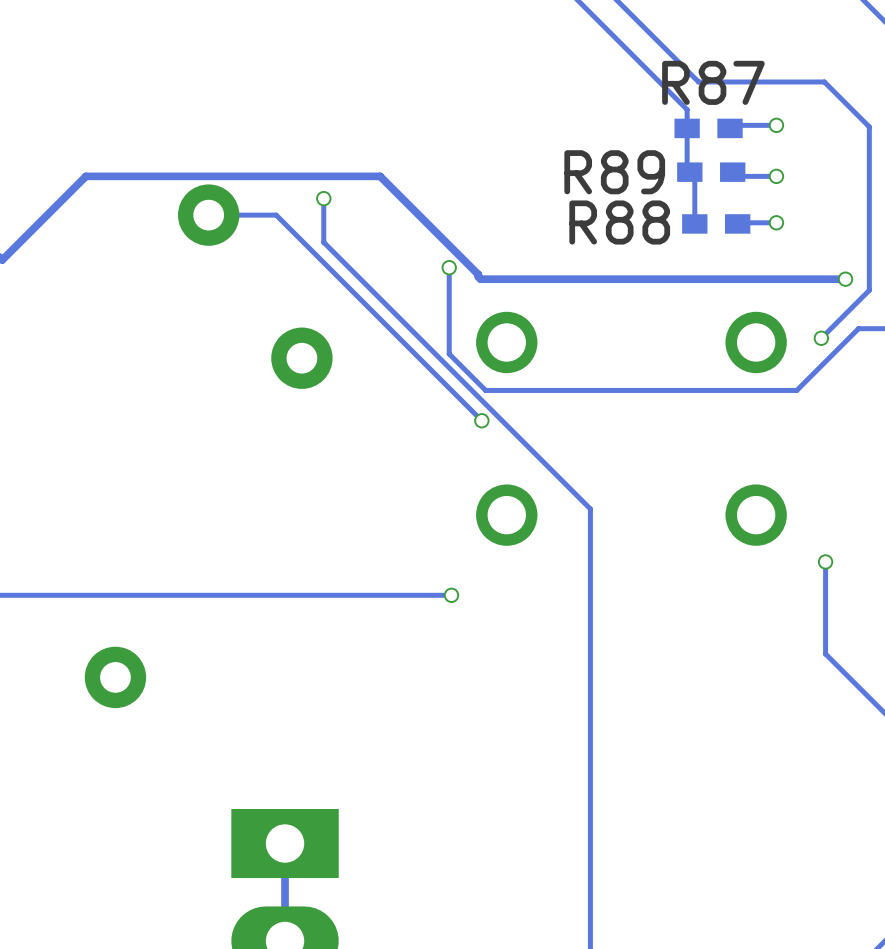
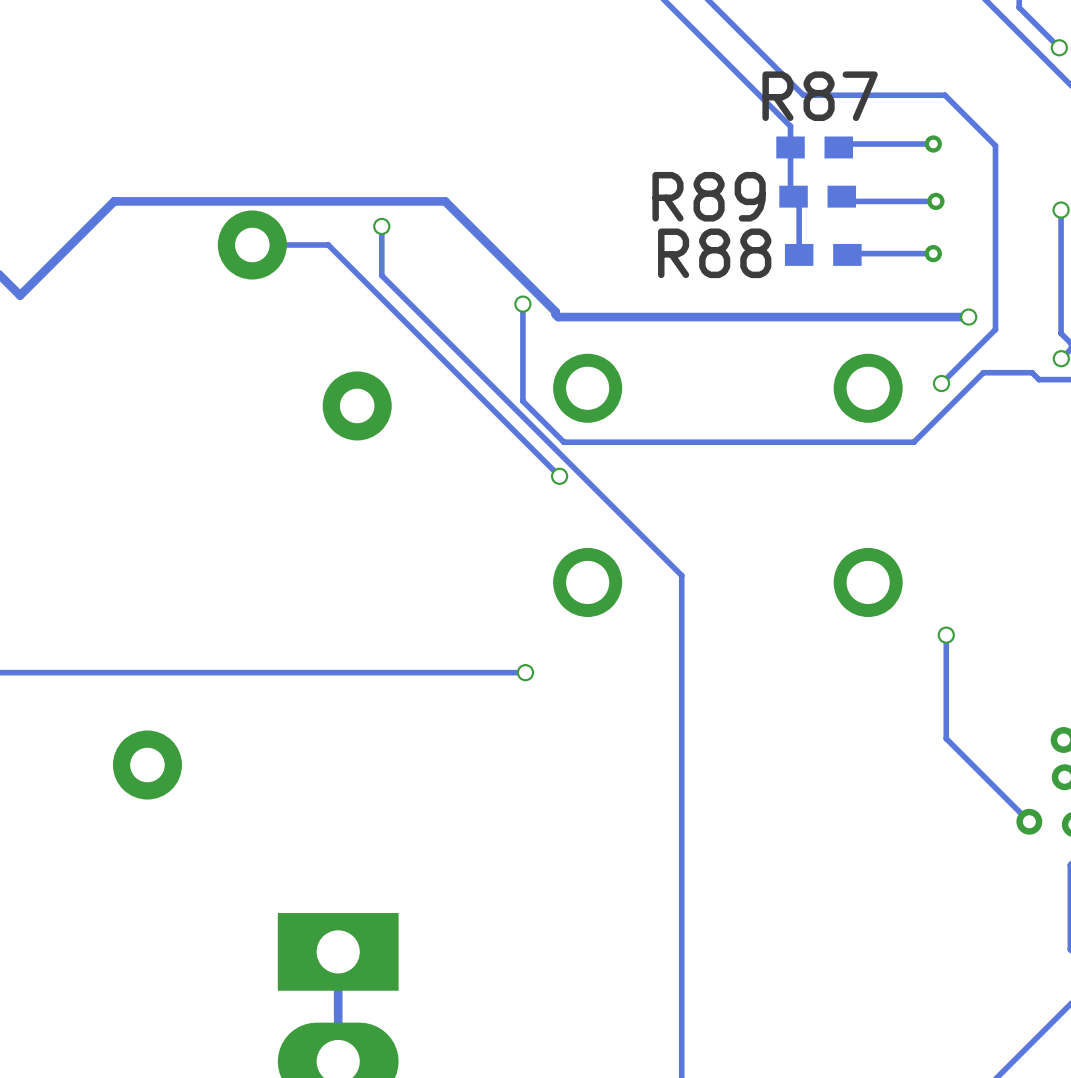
via: (776, 125) -> none
track: none -> (933, 144) (891, 144)
via: none -> (933, 144)
via: (776, 176) -> none
track: none -> (935, 201) (891, 201)
via: none -> (935, 201)
via: (776, 222) -> none
track: none -> (933, 253) (891, 253)
via: none -> (933, 253)

